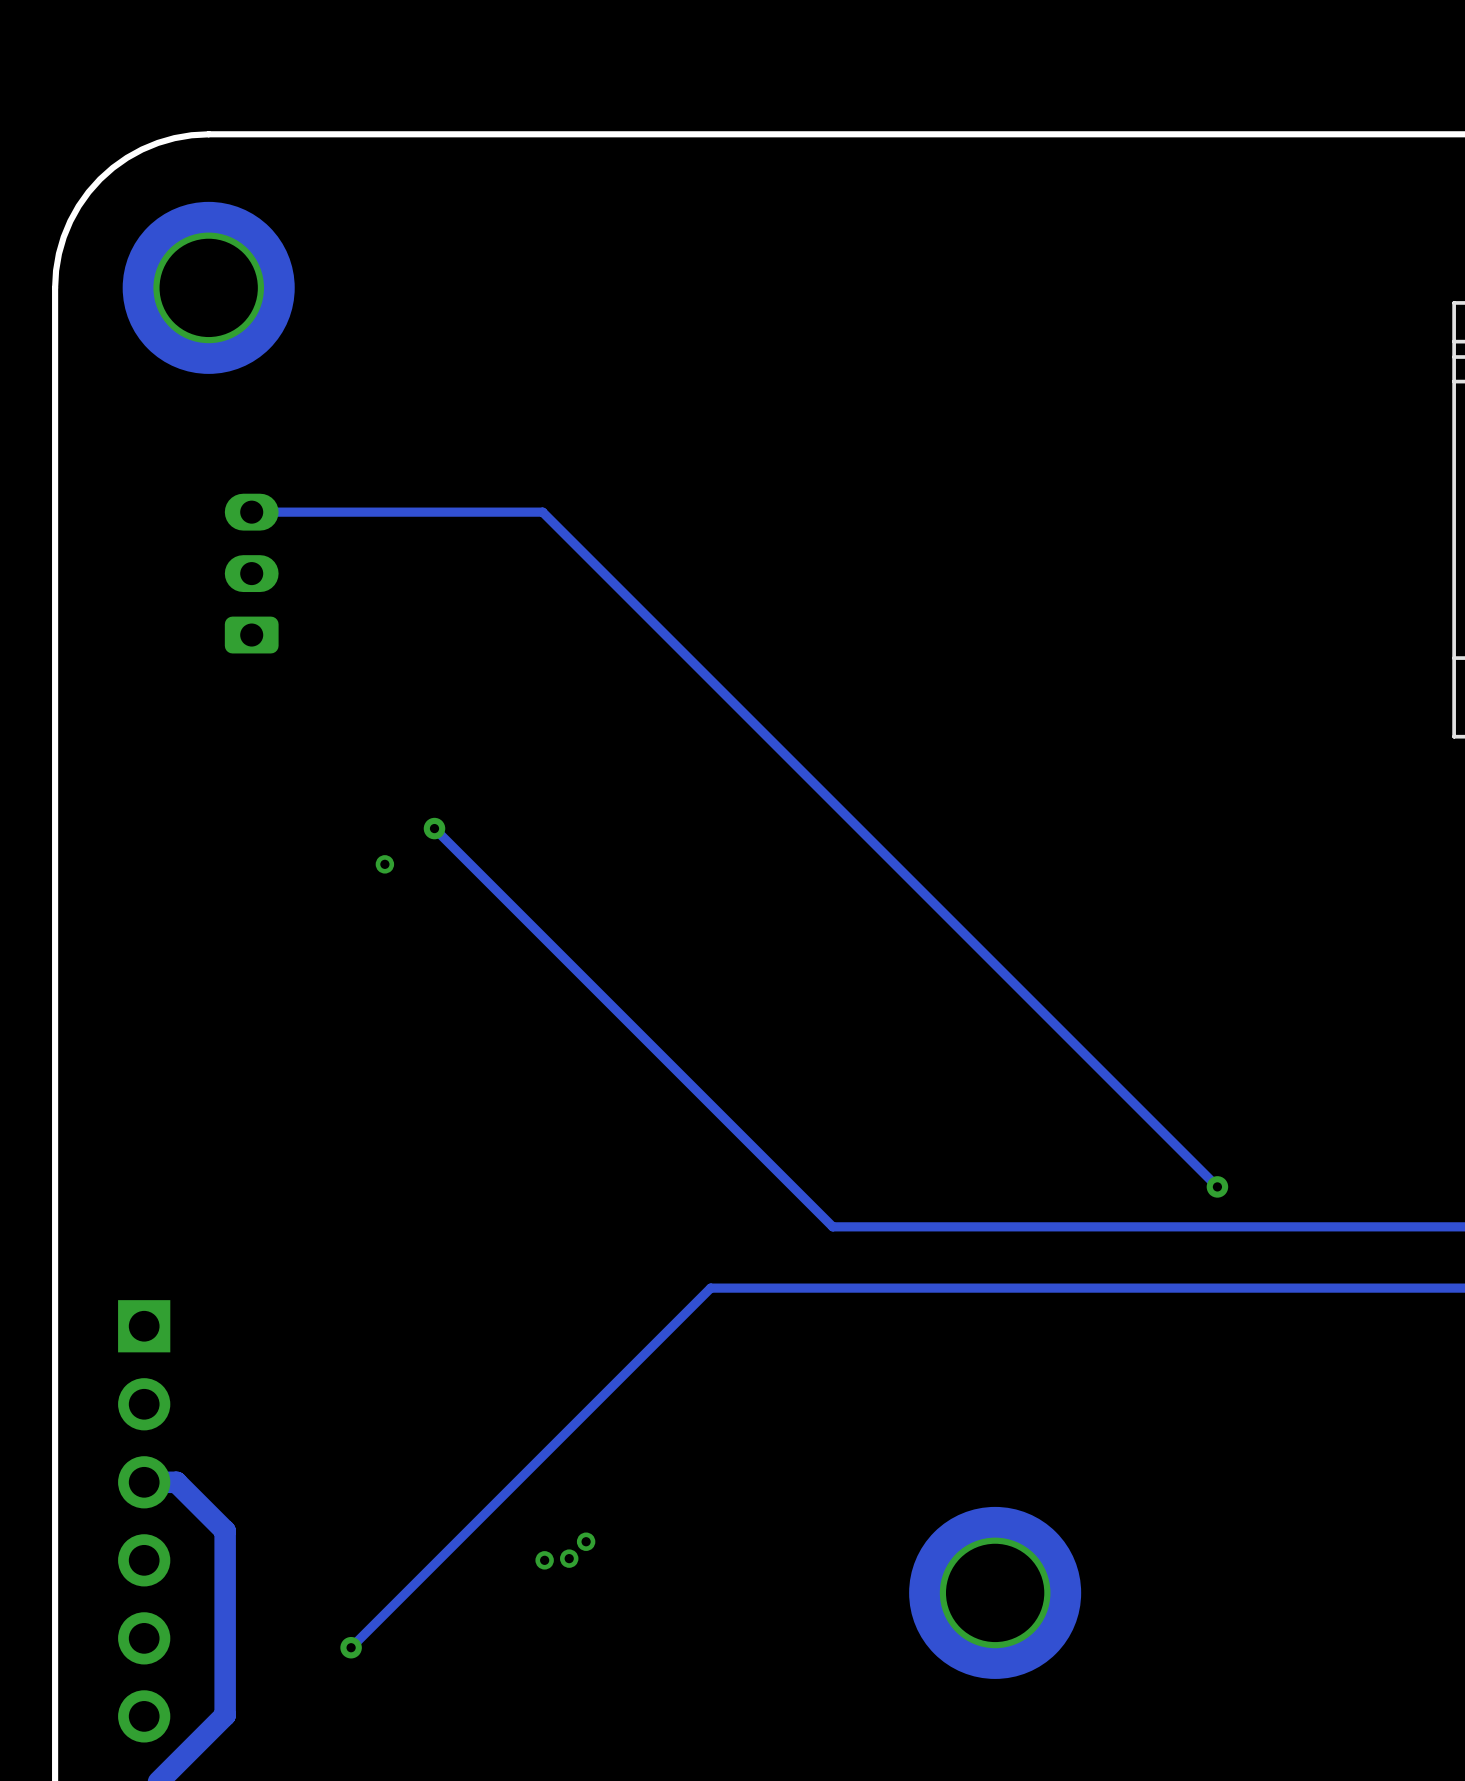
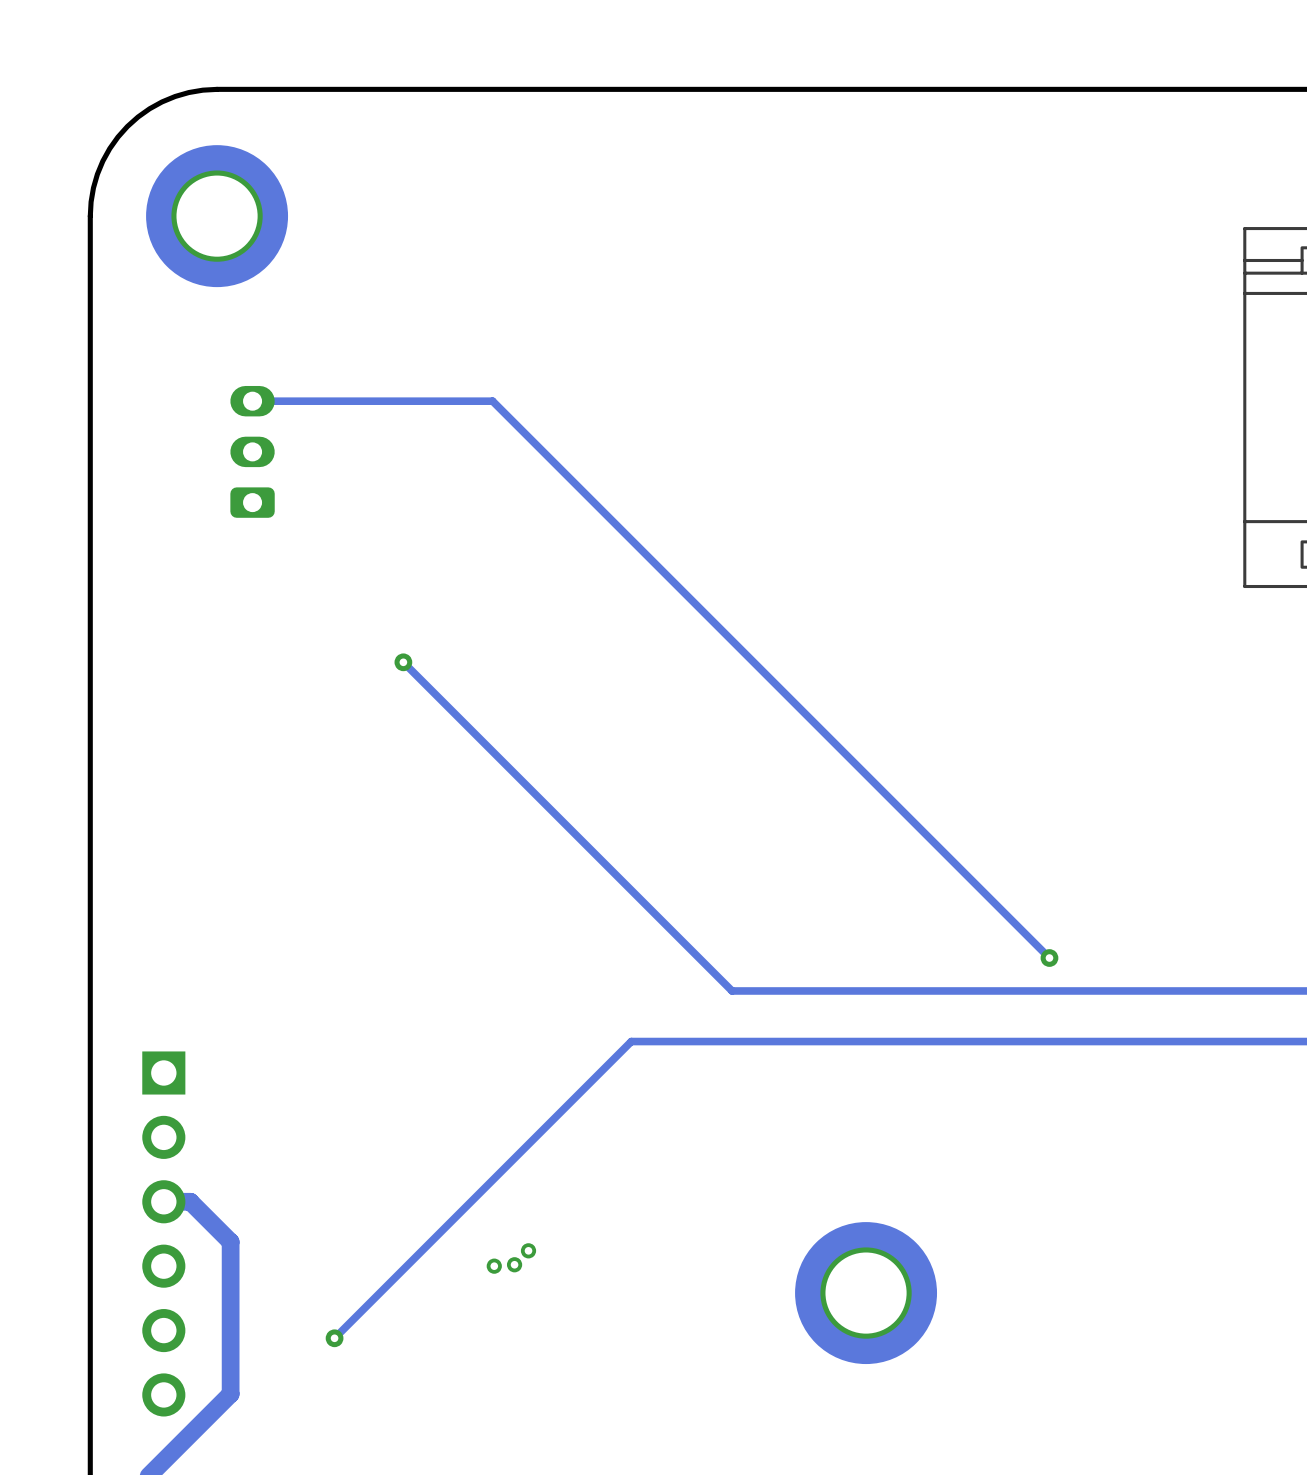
via: (384, 864) -> none

